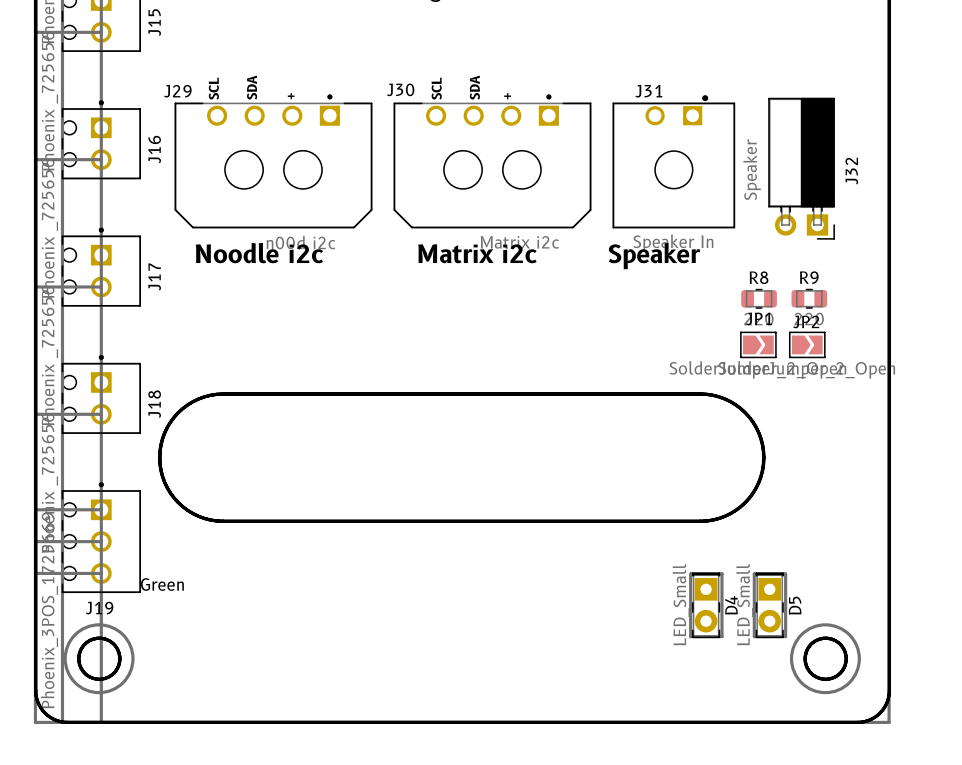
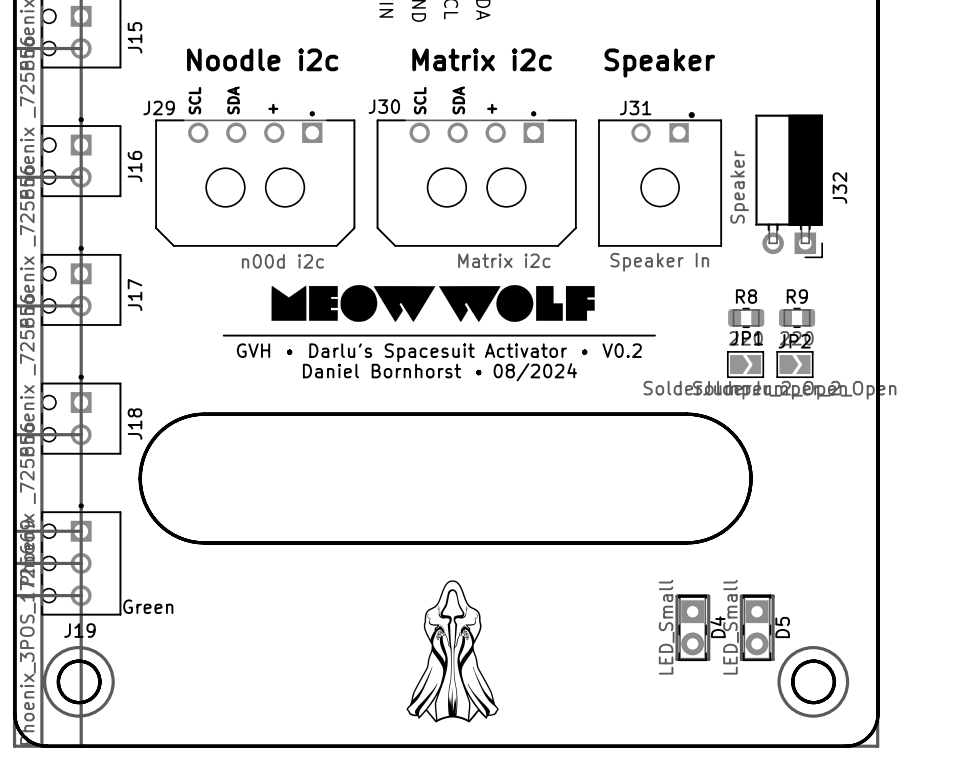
text position: Noodle i2c (259, 253) -> Noodle i2c (262, 59)
text position: Matrix i2c (477, 253) -> Matrix i2c (482, 59)
text position: Speaker (654, 256) -> Speaker (659, 63)
drawing: none -> [271, 285, 595, 323]
line: none -> (223, 335) (654, 335)
text: none -> GVH • Darlu's Spacesuit Activator • V0.2 (439, 352)
text: none -> Daniel Bornhorst • 08/2024 (439, 372)
drawing: none -> [406, 580, 499, 723]

